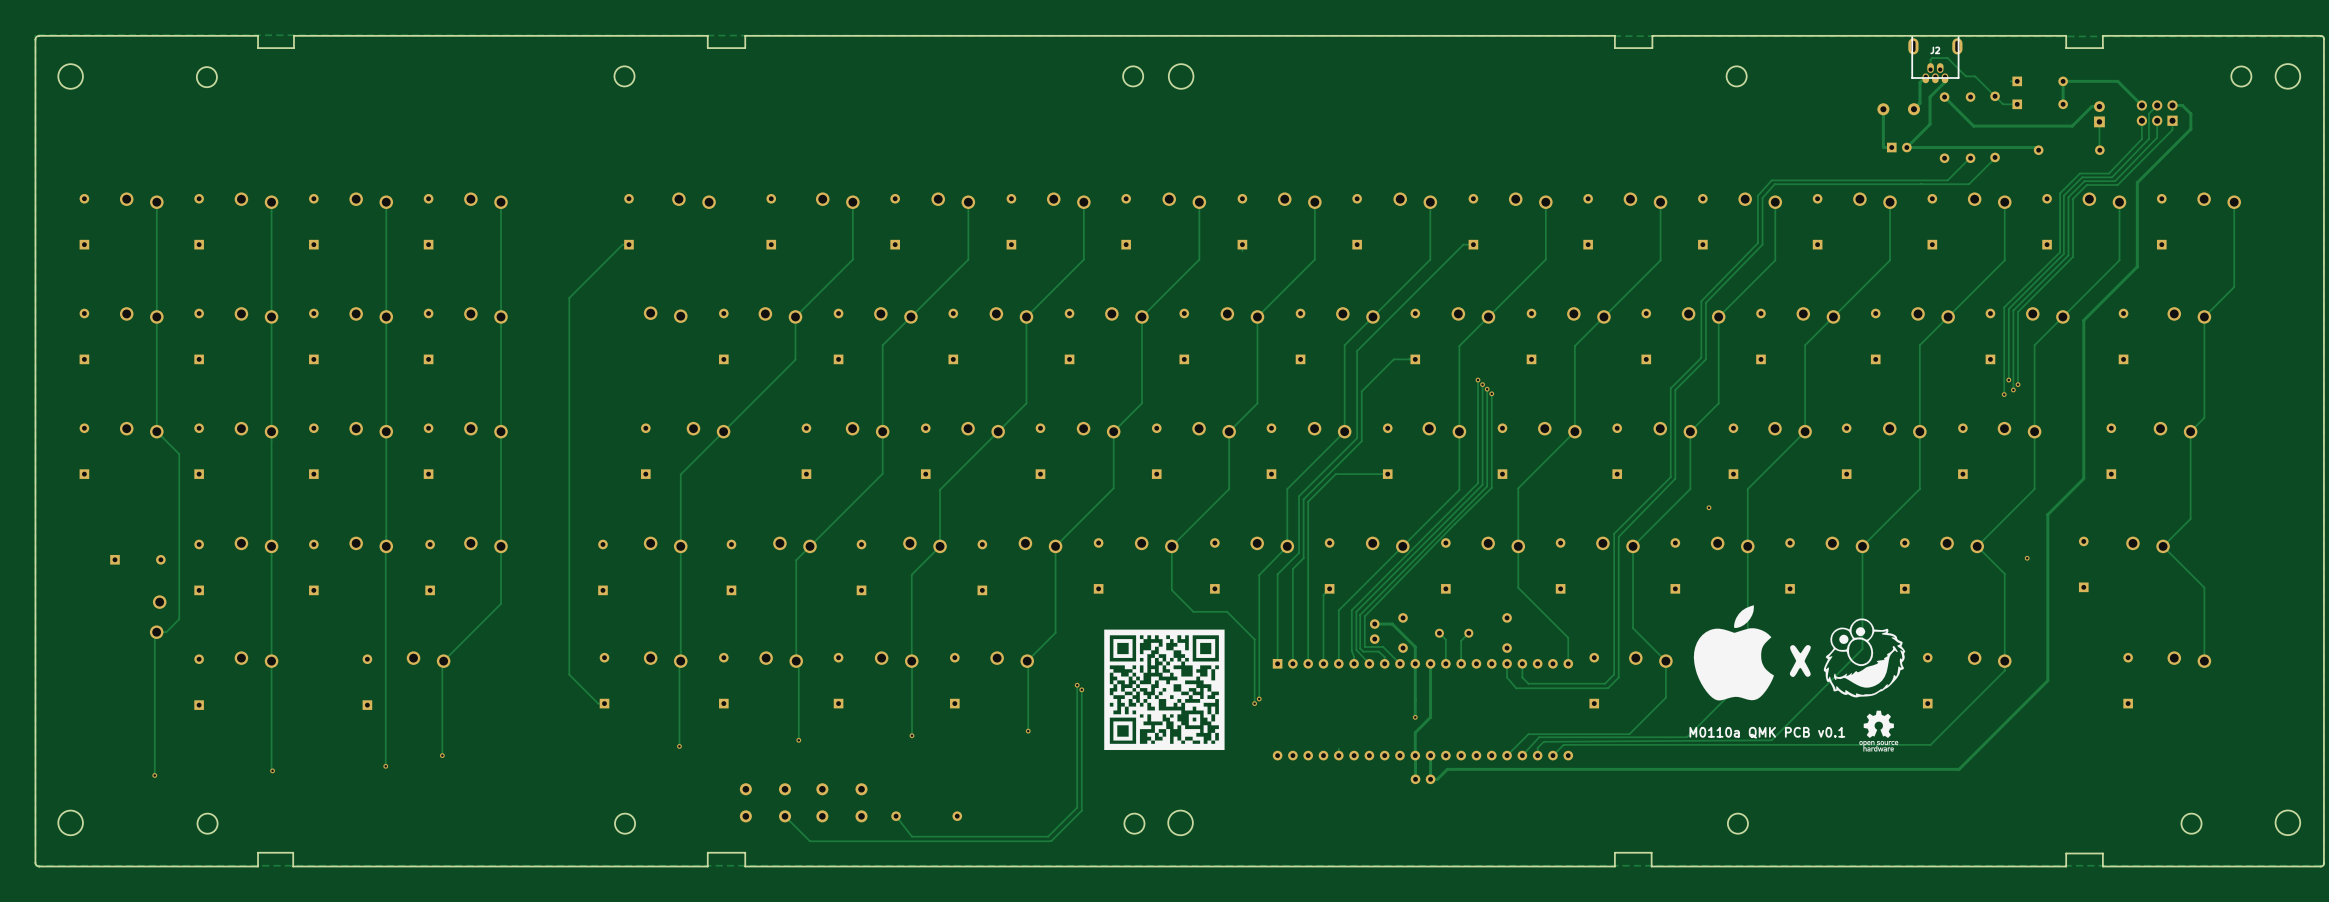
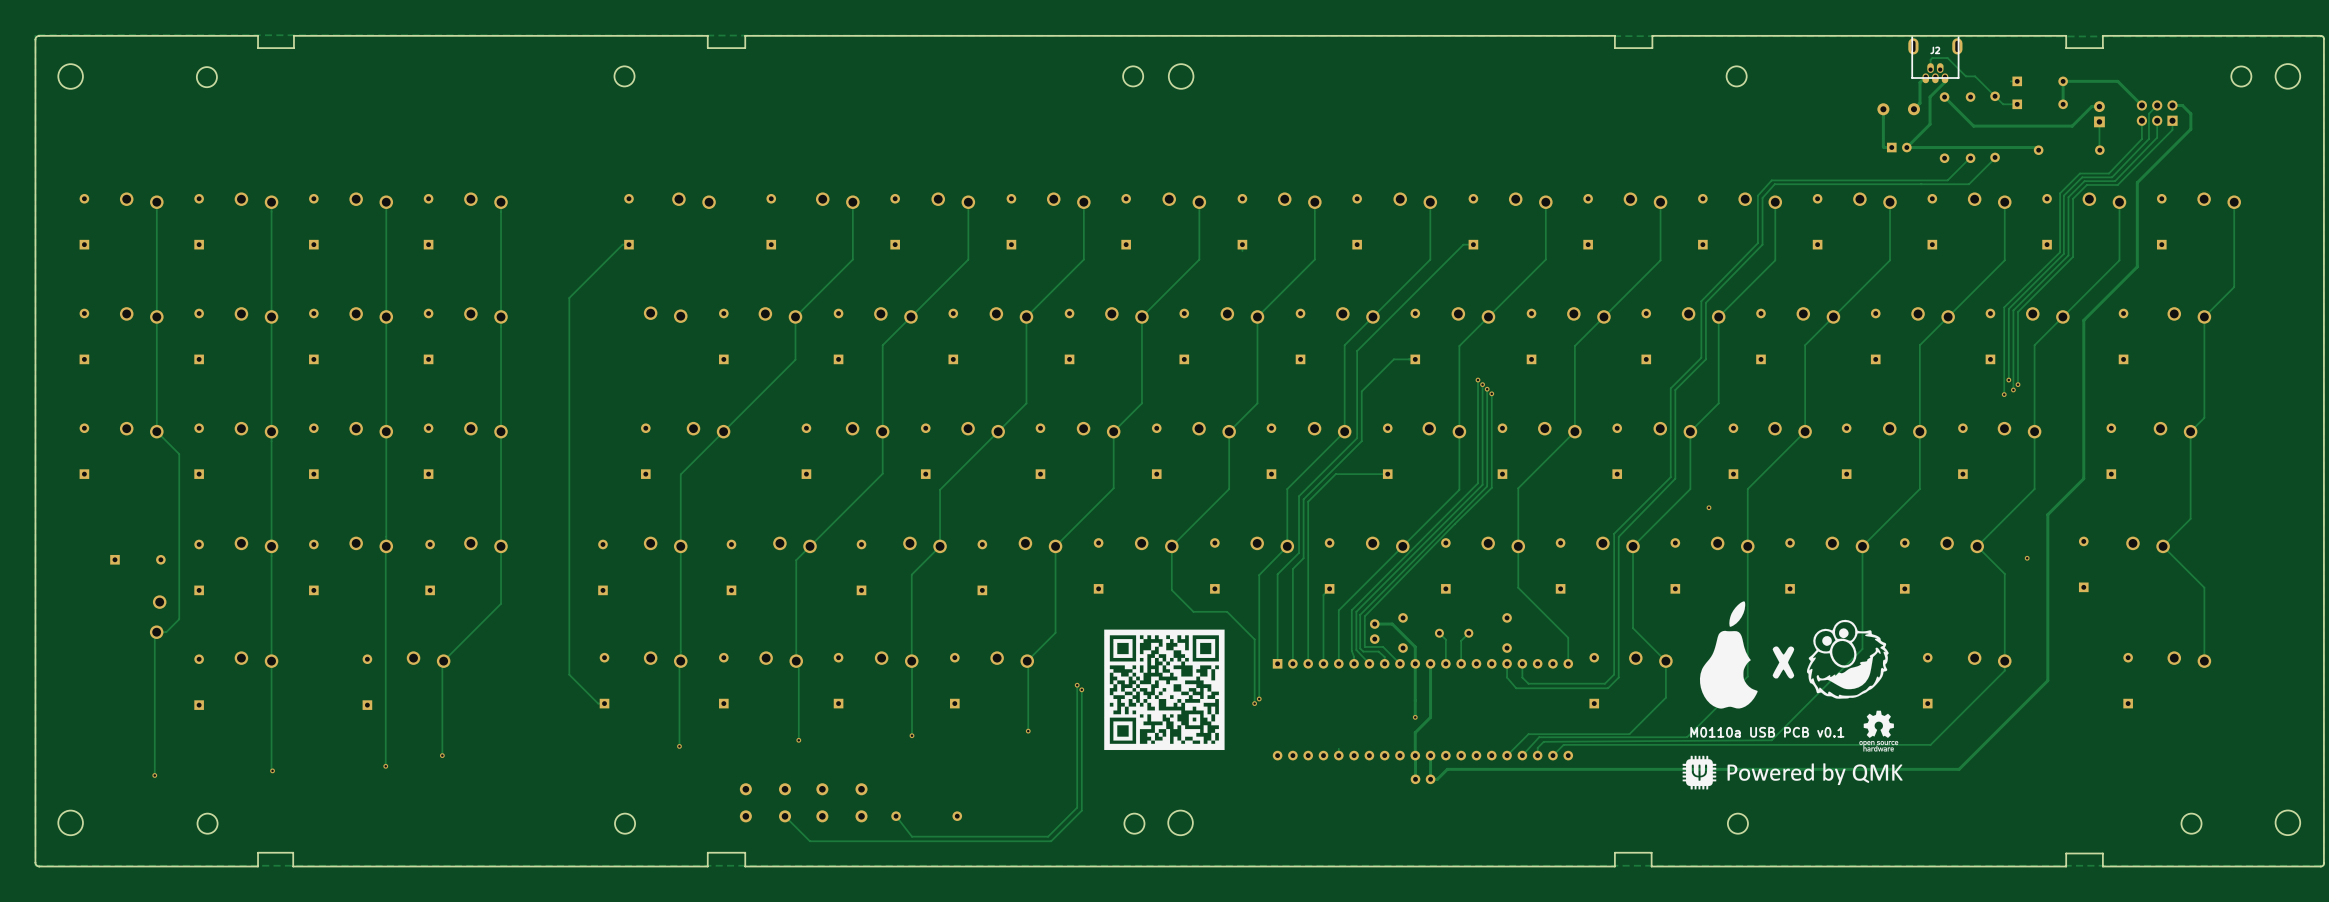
drawing shape: [1693, 605, 1906, 701] -> [1699, 601, 1889, 709]
text: M0110a QMK PCB v0.1 (1767, 732) -> M0110a USB PCB v0.1 (1767, 732)
drawing: none -> [1682, 755, 1903, 790]

